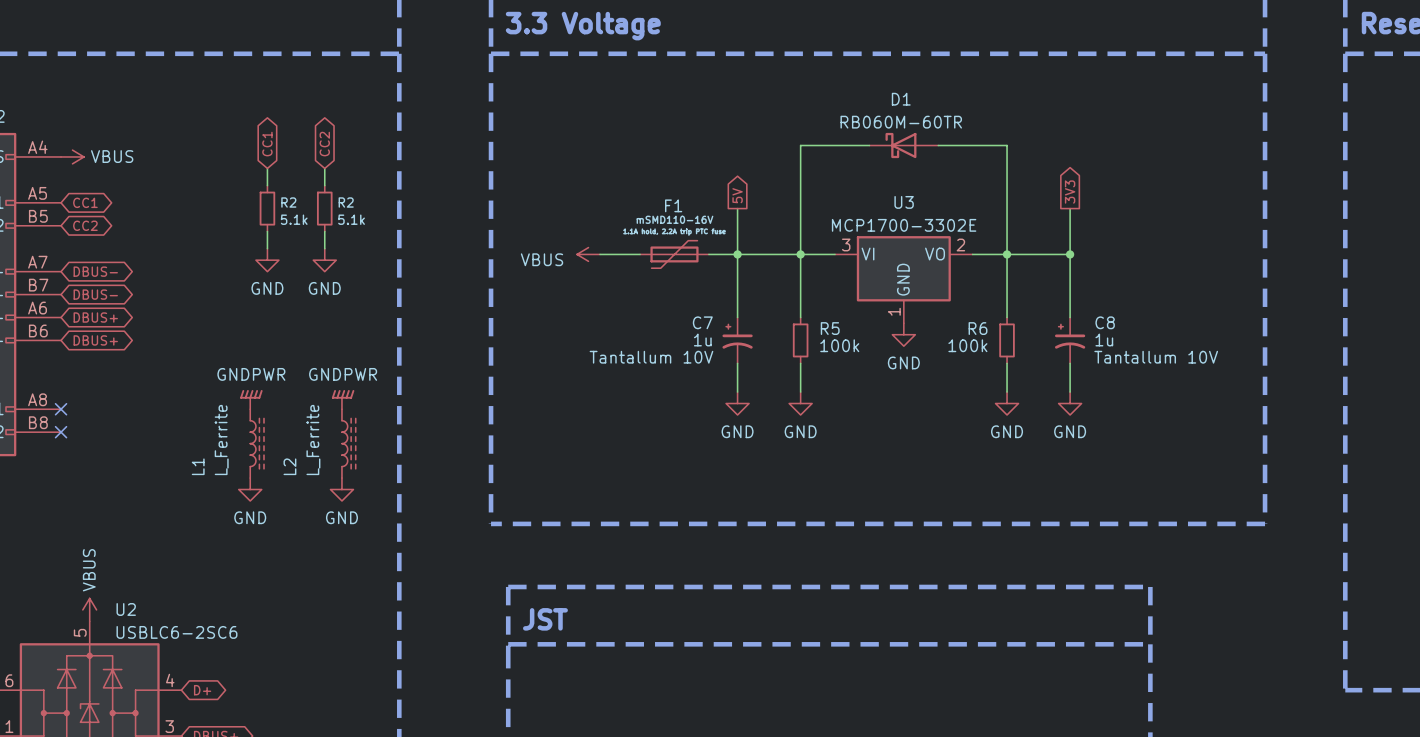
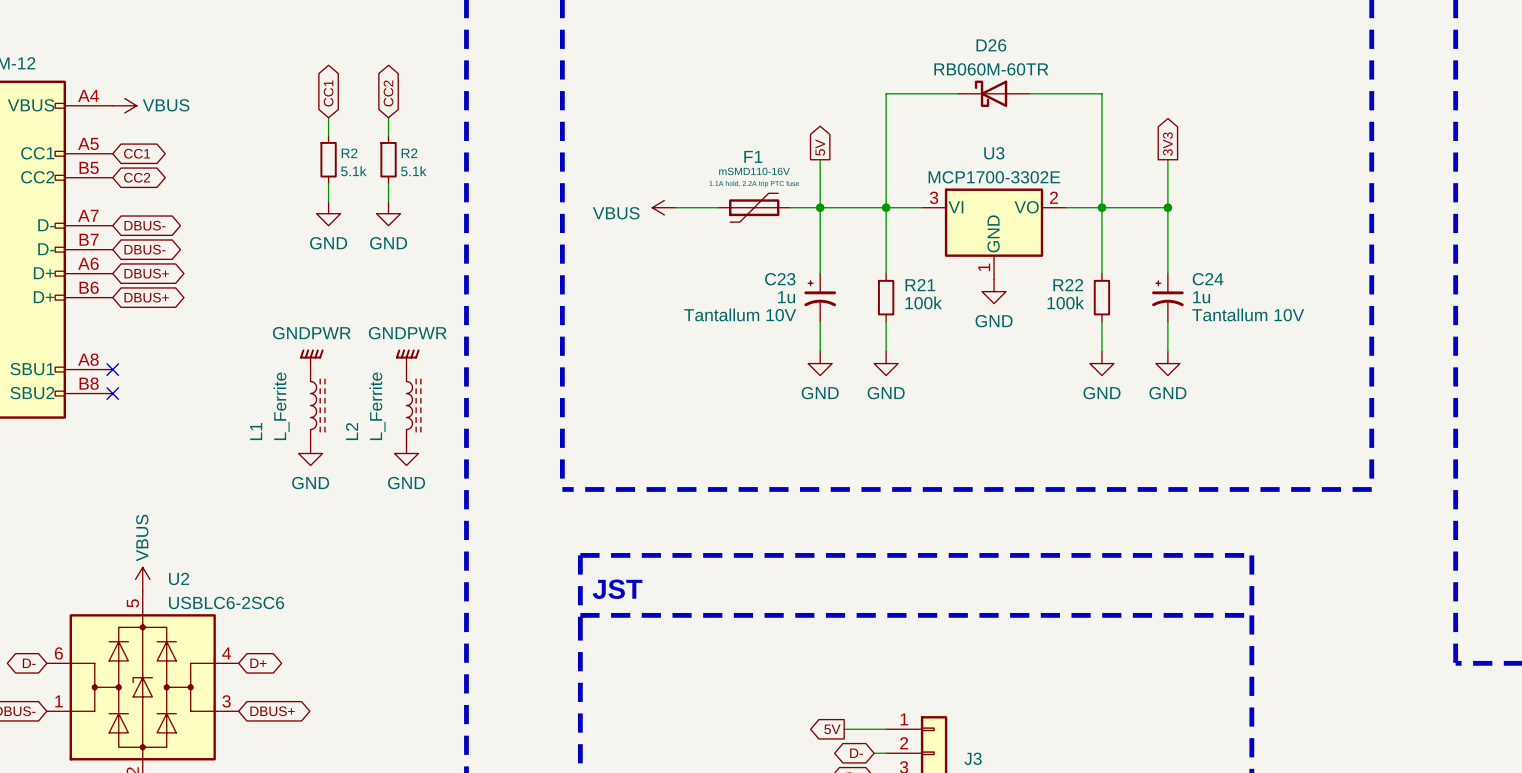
D1 name: D1 (901, 99) -> D26 (991, 45)
C7 name: C7 (702, 322) -> C23 (780, 279)
C8 name: C8 (1105, 322) -> C24 (1208, 279)
R5 name: R5 (830, 328) -> R21 (920, 285)
R6 name: R6 (978, 328) -> R22 (1068, 285)

